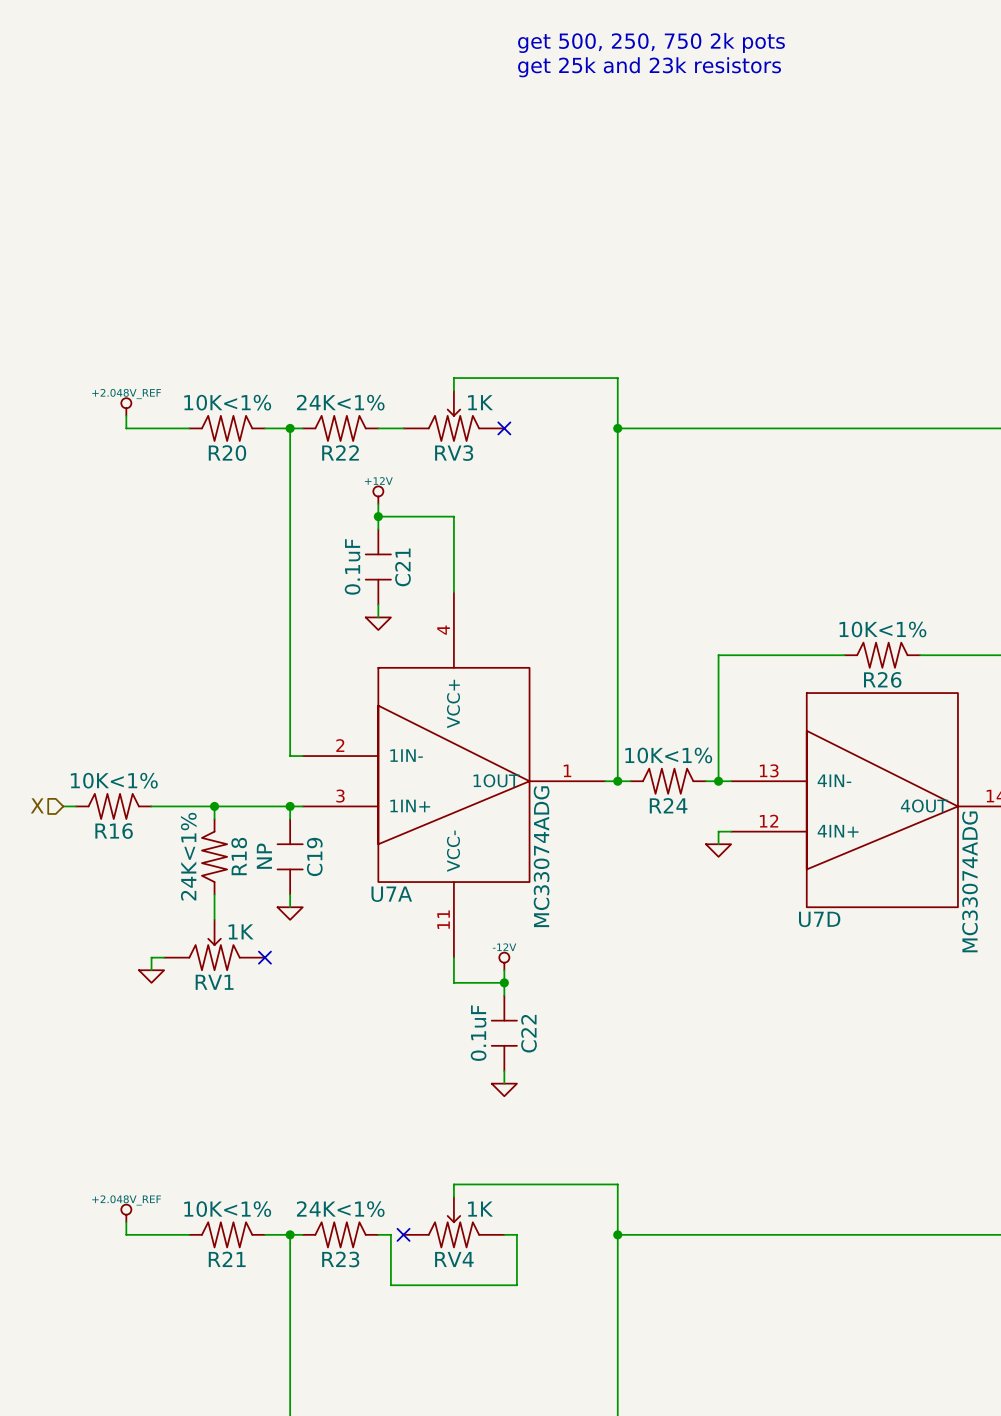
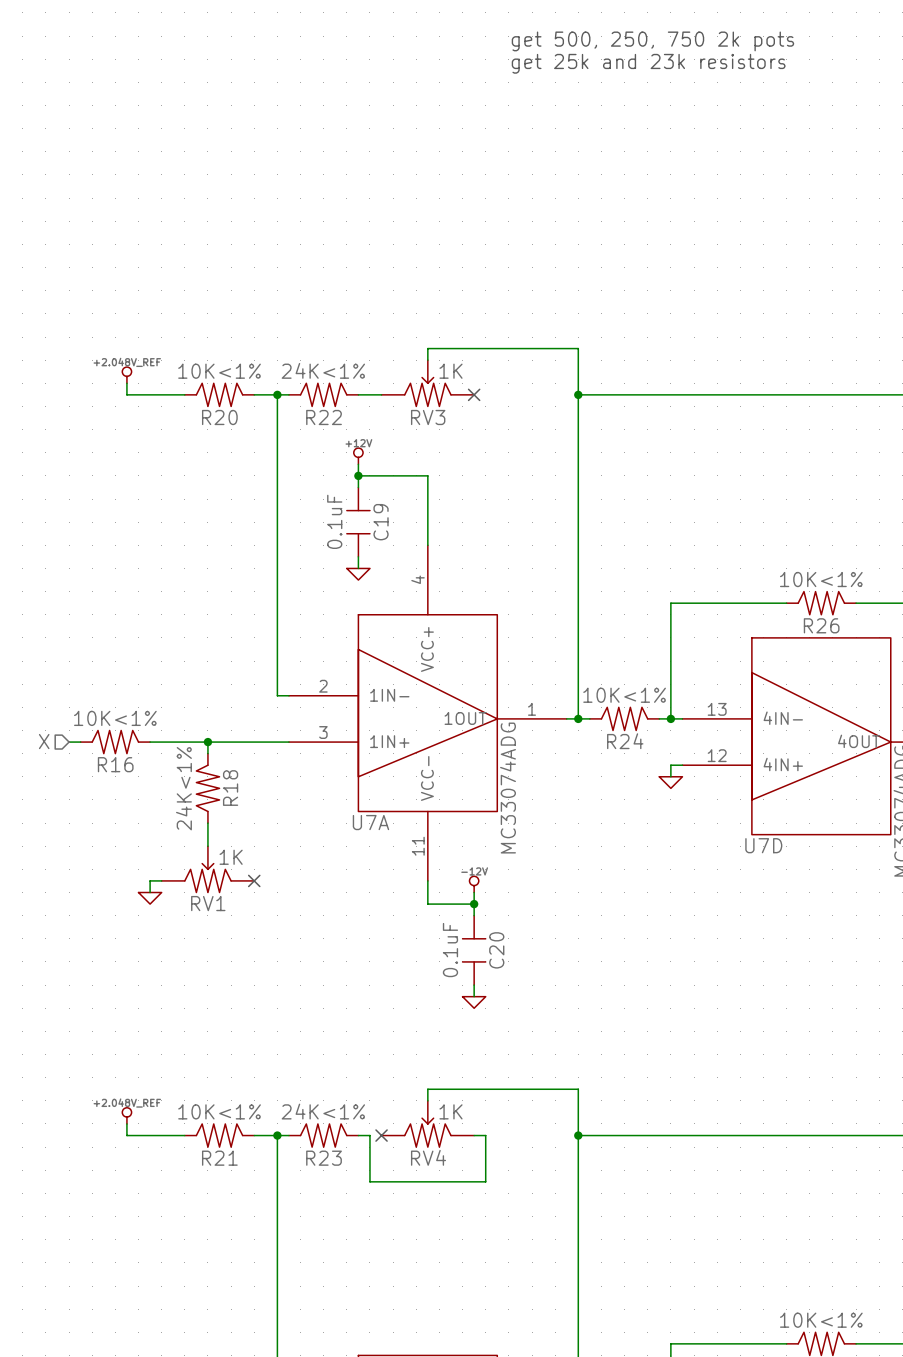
text position: get 500, 250, 750 2k pots (651, 42) -> get 500, 250, 750 2k pots (652, 41)
text position: get 25k and 23k resistors (649, 67) -> get 25k and 23k resistors (648, 63)
C21 name: C21 (402, 567) -> C19 (381, 522)
wire: (290, 806) (290, 819) -> none
junction: (290, 806) -> none
C19: NP (290, 856) -> none
wire: (290, 894) (290, 907) -> none
power symbol: (290, 913) -> none
C22 name: C22 (528, 1033) -> C20 (496, 950)

